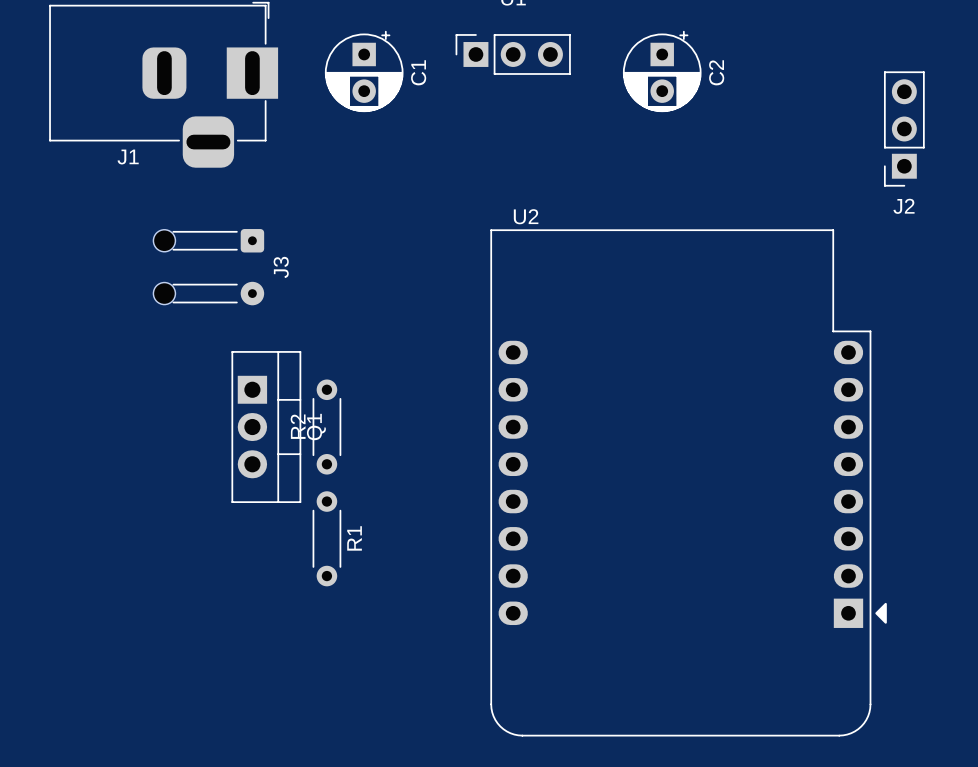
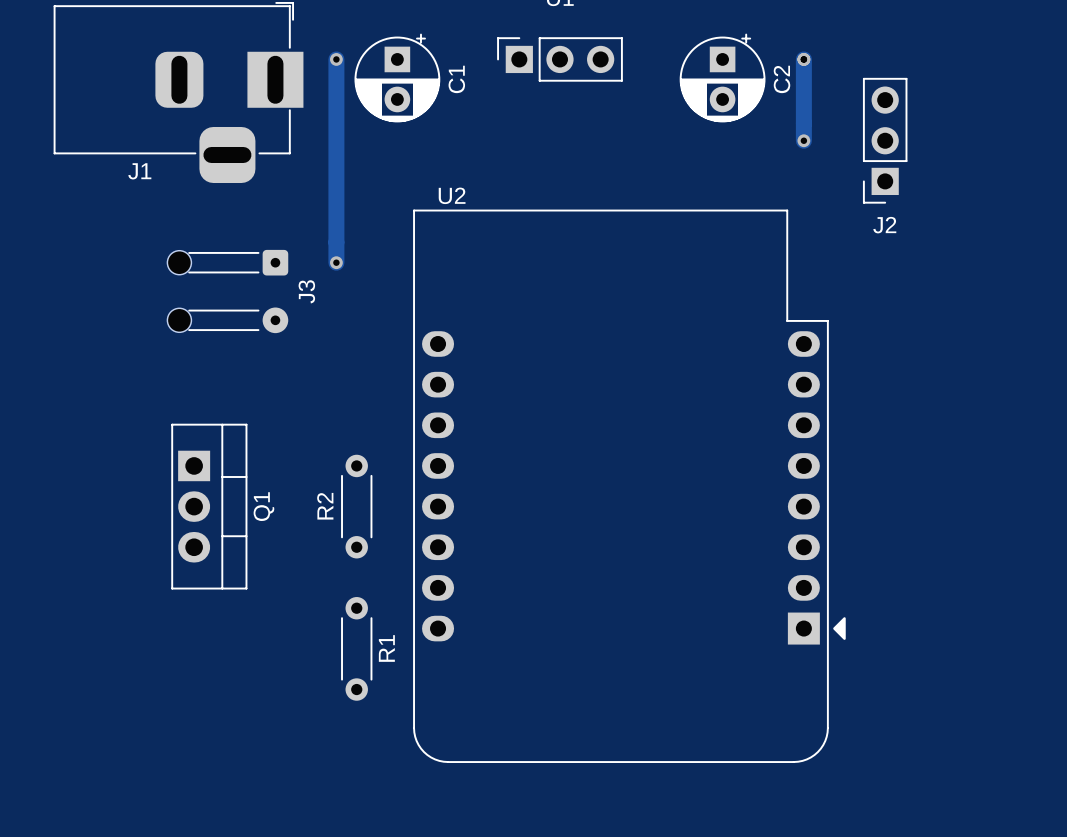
track: none -> (336, 59) (336, 262)
via: none -> (336, 59)
track: none -> (803, 59) (803, 140)
via: none -> (803, 59)
via: none -> (803, 140)
J2 position: (904, 128) -> (885, 140)
via: none -> (336, 262)
Q1 position: (266, 427) -> (209, 506)
R2 position: (326, 427) -> (356, 506)
U2 position: (688, 482) -> (629, 486)
R1 position: (326, 538) -> (356, 648)

